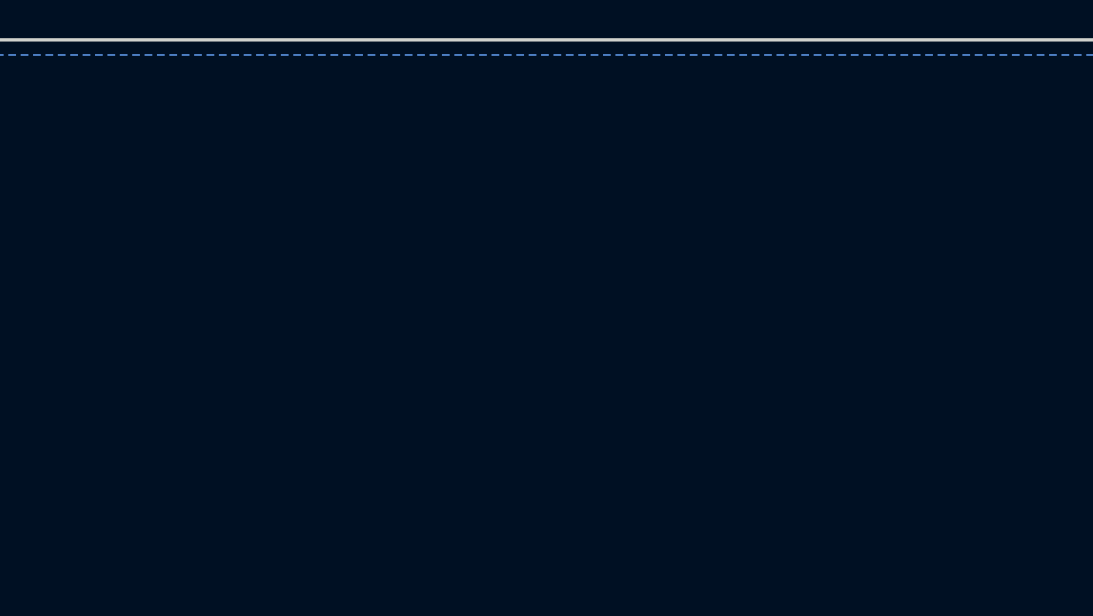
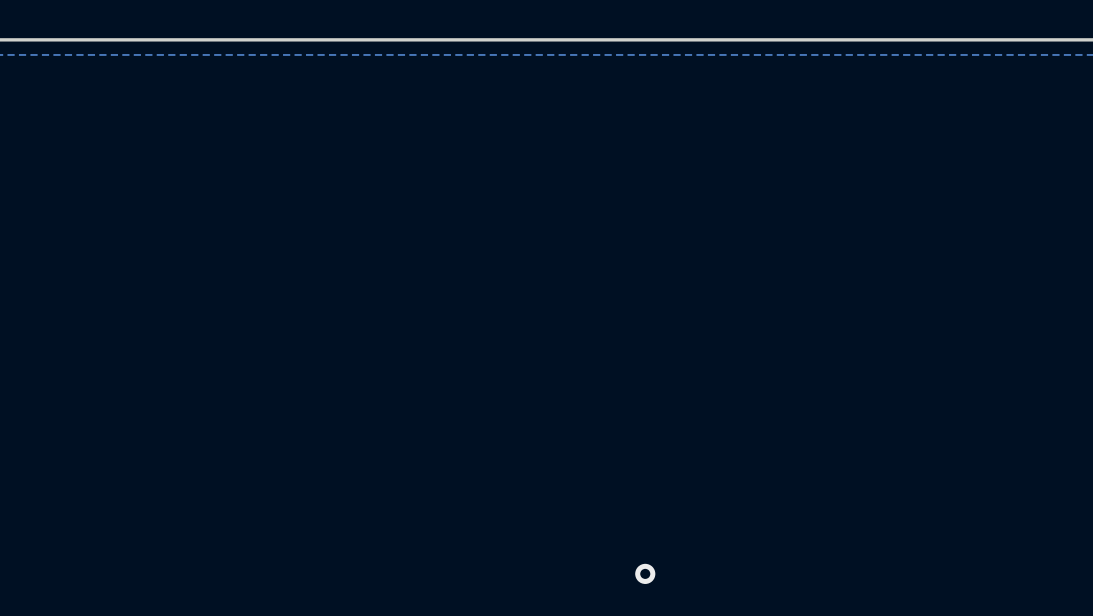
via: none -> (645, 573)

